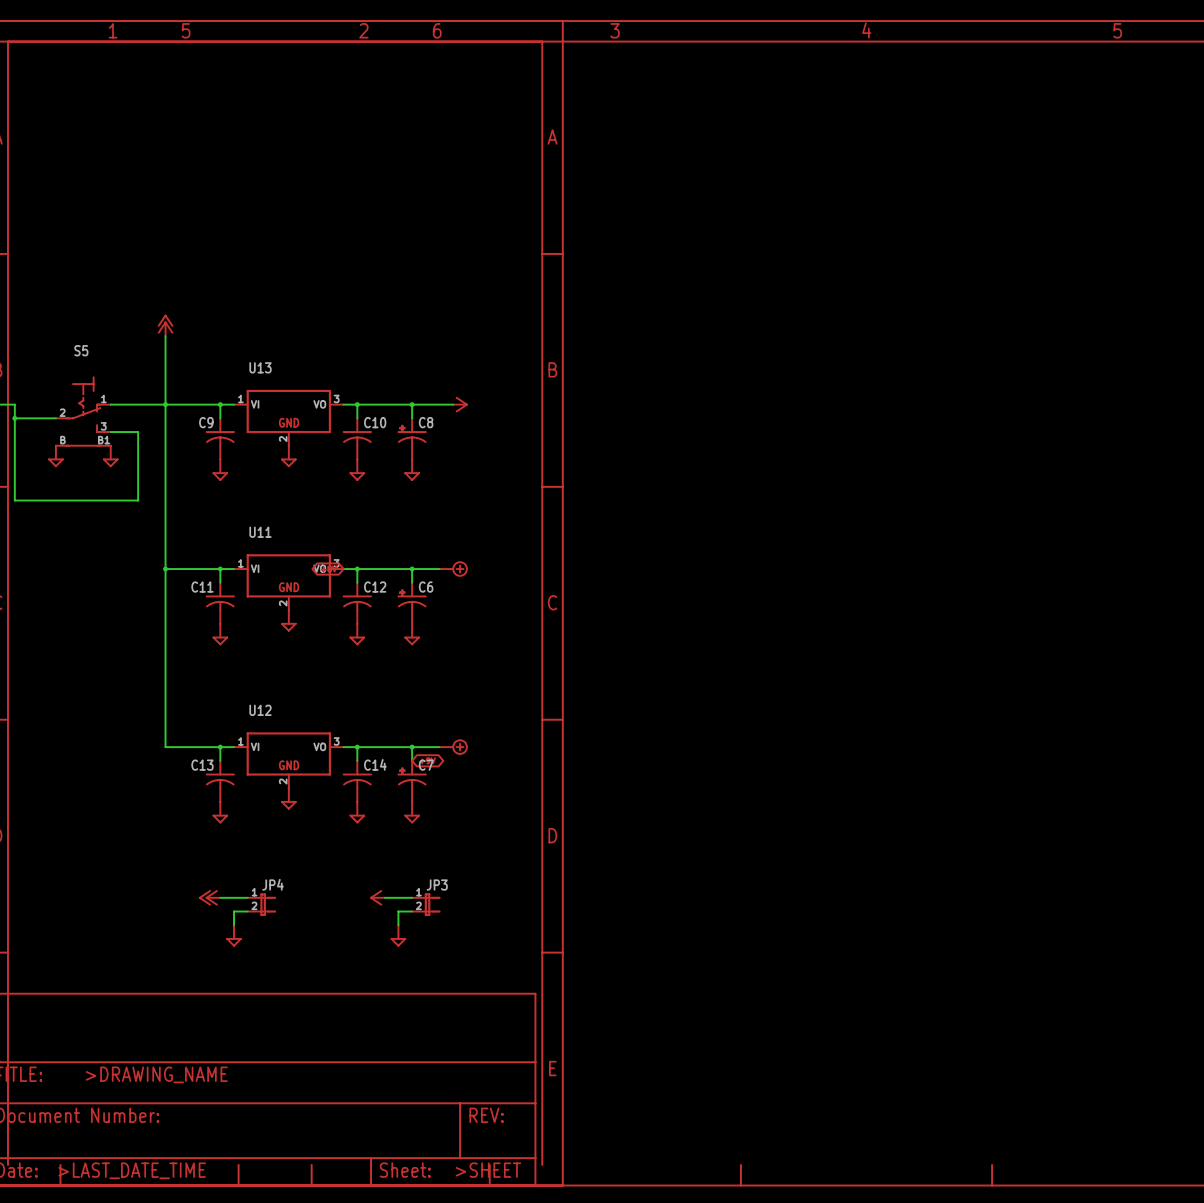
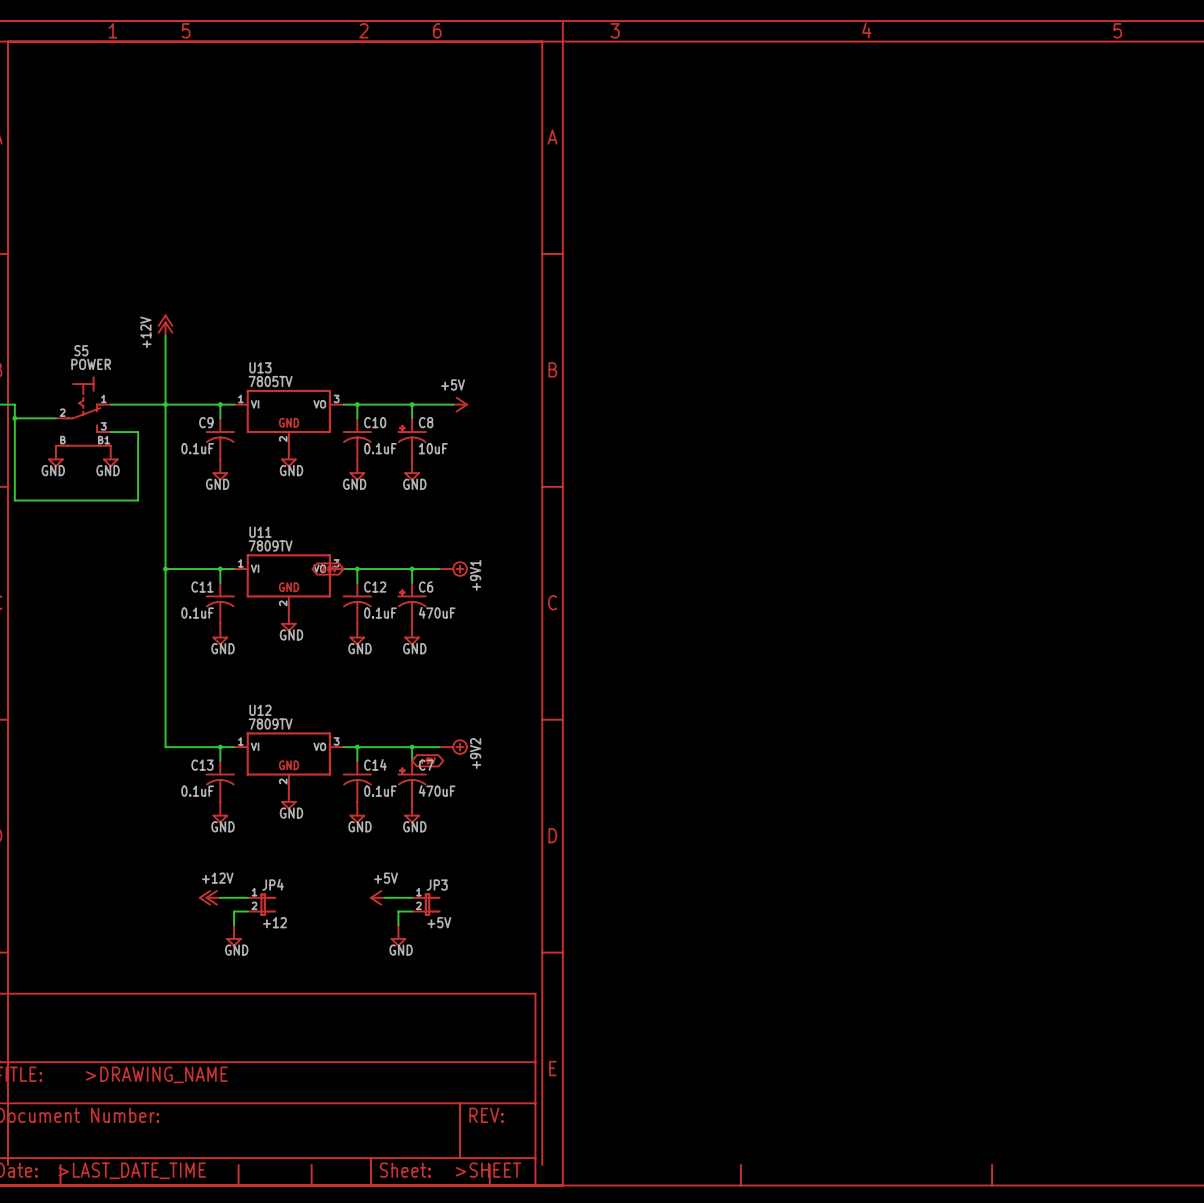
power symbol text: none -> +12V (145, 332)
S5 value: none -> POWER (91, 364)
U13 value: none -> 7805TV (270, 381)
power symbol text: none -> +5V (453, 384)
C9 value: none -> 0.1uF (197, 448)
C10 value: none -> 0.1uF (380, 448)
C8 value: none -> 10uF (433, 448)
power symbol text: none -> GND (53, 470)
power symbol text: none -> GND (108, 470)
power symbol text: none -> GND (291, 470)
power symbol text: none -> GND (217, 484)
power symbol text: none -> GND (354, 484)
power symbol text: none -> GND (414, 484)
U11 value: none -> 7809TV (270, 545)
power symbol text: none -> +9V1 (475, 575)
C6 value: none -> 470uF (437, 612)
C11 value: none -> 0.1uF (197, 613)
C12 value: none -> 0.1uF (380, 613)
power symbol text: none -> GND (291, 634)
power symbol text: none -> GND (223, 648)
power symbol text: none -> GND (360, 648)
power symbol text: none -> GND (414, 648)
U12 value: none -> 7809TV (270, 724)
power symbol text: none -> +9V2 (475, 753)
C7 value: none -> 470uF (437, 790)
C13 value: none -> 0.1uF (197, 791)
C14 value: none -> 0.1uF (380, 791)
power symbol text: none -> GND (291, 813)
power symbol text: none -> GND (223, 826)
power symbol text: none -> GND (360, 826)
power symbol text: none -> GND (414, 826)
power symbol text: none -> +12V (217, 878)
power symbol text: none -> +5V (386, 878)
JP4 value: none -> +12 (274, 922)
JP3 value: none -> +5V (439, 922)
power symbol text: none -> GND (236, 950)
power symbol text: none -> GND (401, 950)

